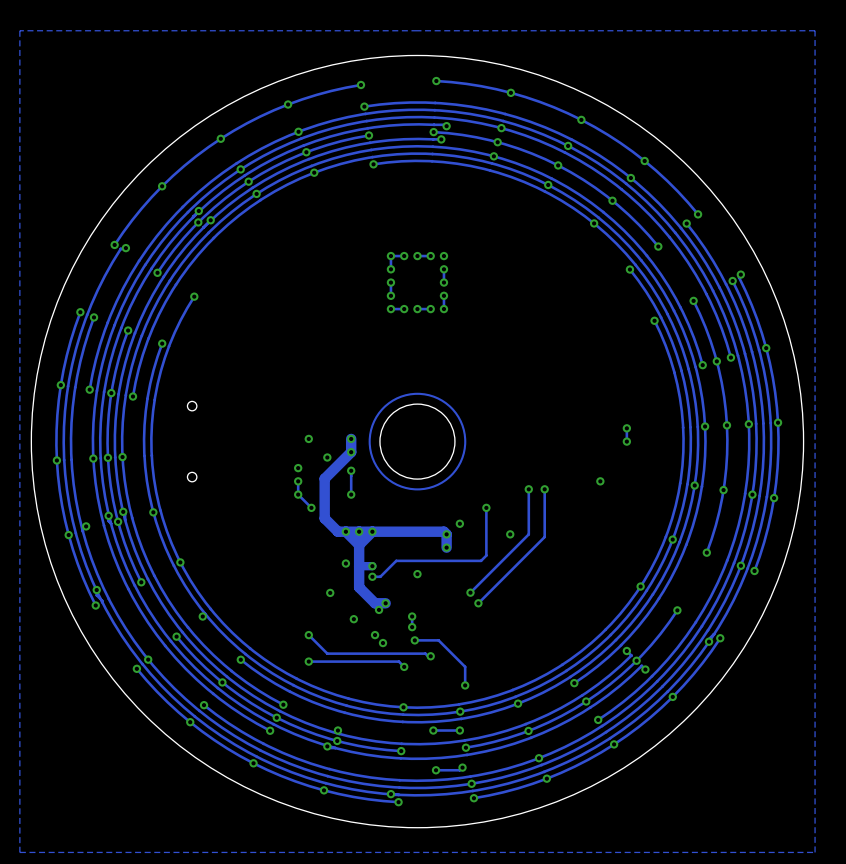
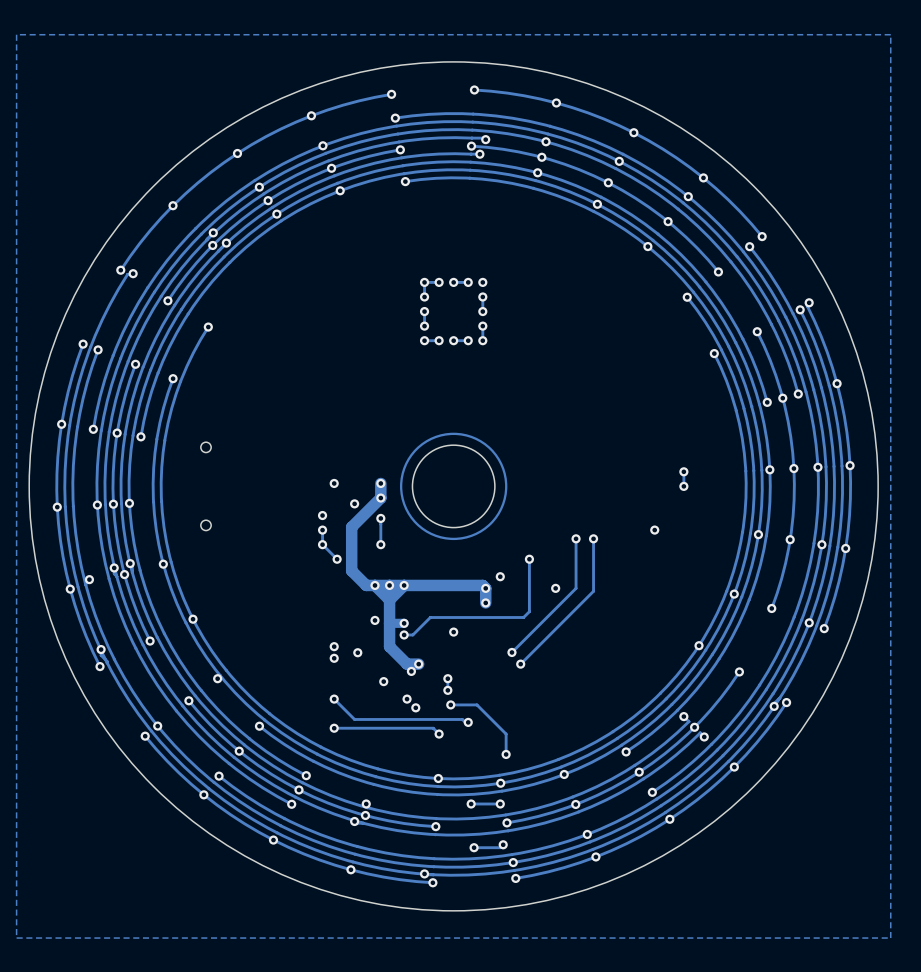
via: none -> (334, 646)
via: none -> (334, 658)

